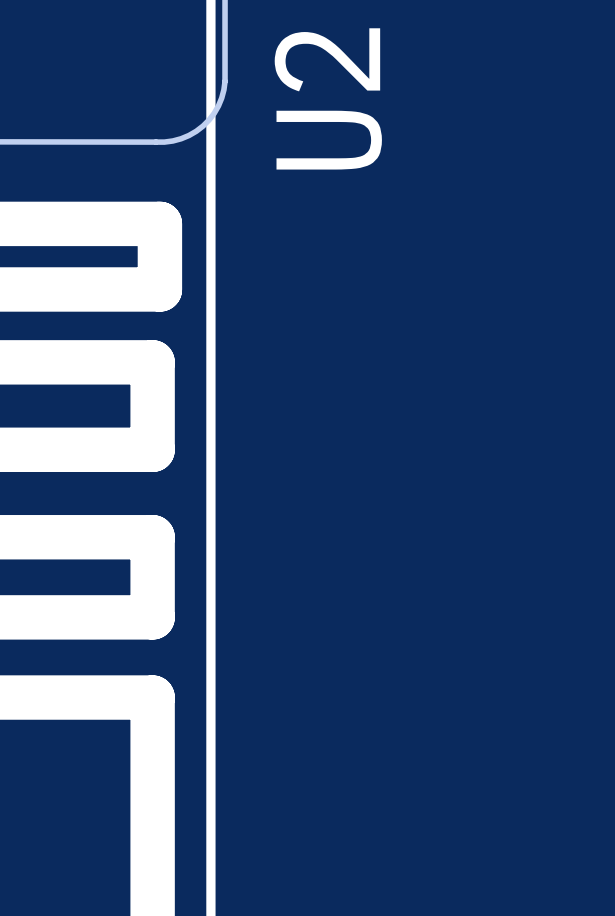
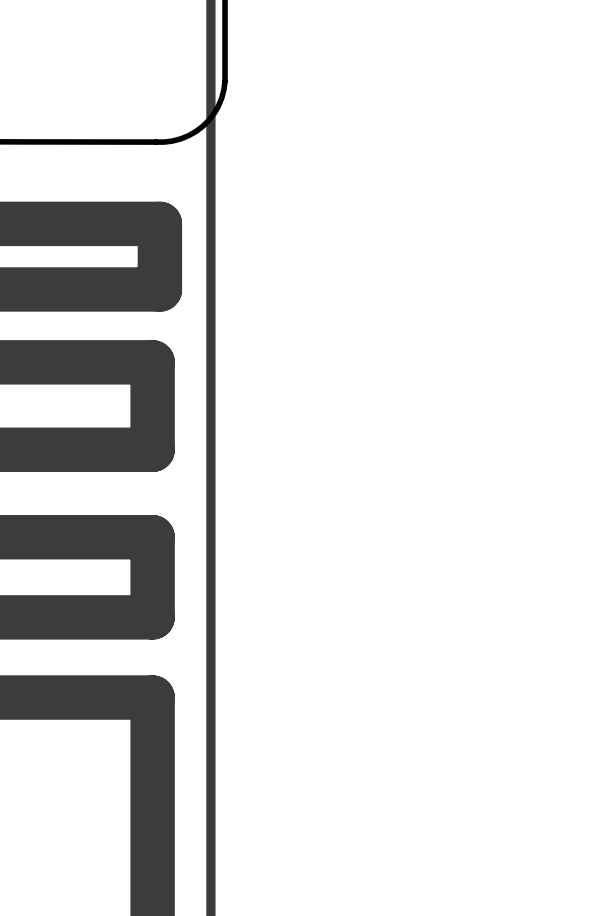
U2 name: U2 (328, 98) -> none

